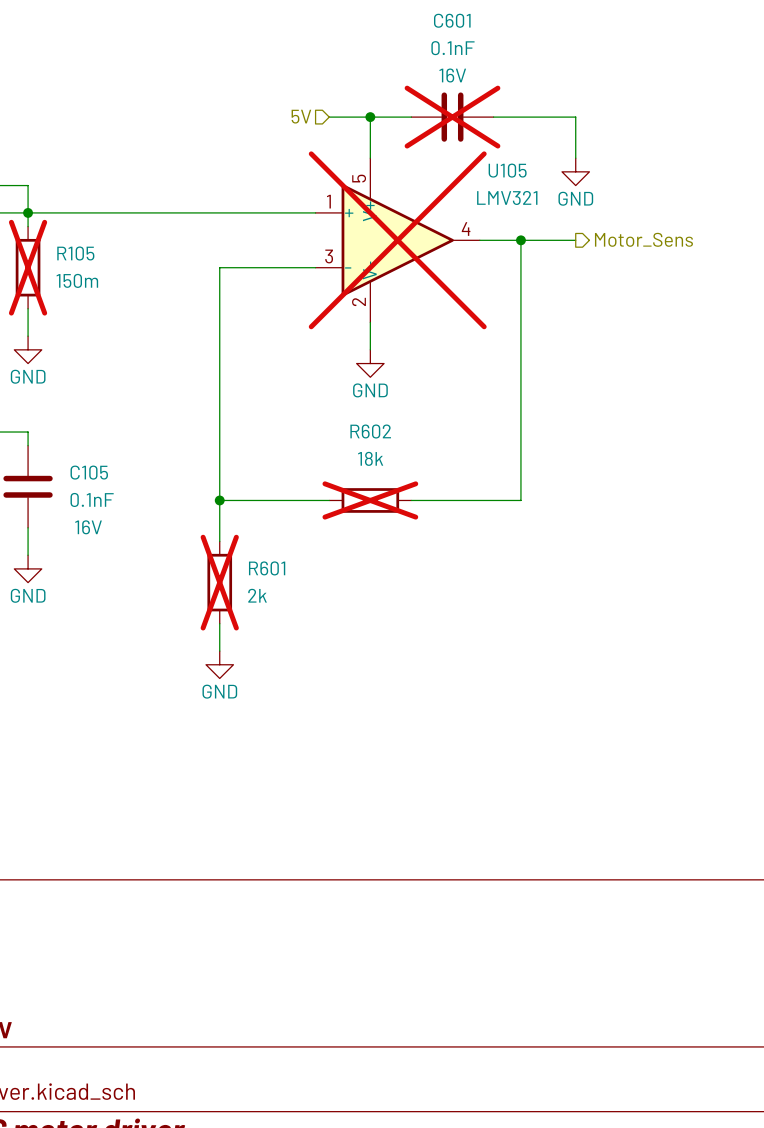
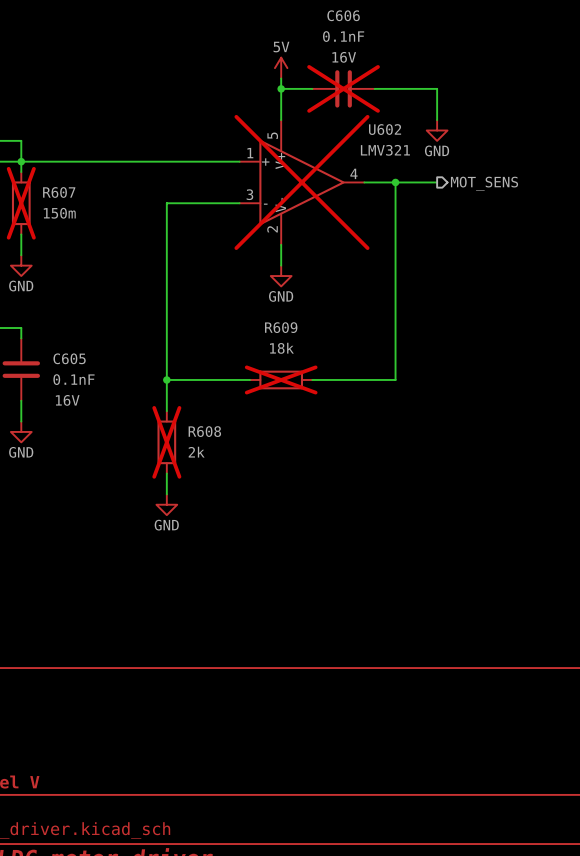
C601 name: C601 (452, 20) -> C606 (343, 15)
power symbol: none -> 5V (281, 68)
hierarchical label: 5V (301, 116) -> none
wire: (329, 117) (370, 117) -> (281, 78) (281, 88)
U105 name: U105 (507, 170) -> U602 (385, 129)
hierarchical label: Motor_Sens (643, 239) -> MOT_SENS (484, 183)
R105 name: R105 (75, 253) -> R607 (59, 192)
R602 name: R602 (370, 431) -> R609 (281, 327)
C105 name: C105 (89, 472) -> C605 (69, 358)
R601 name: R601 (267, 568) -> R608 (204, 431)

